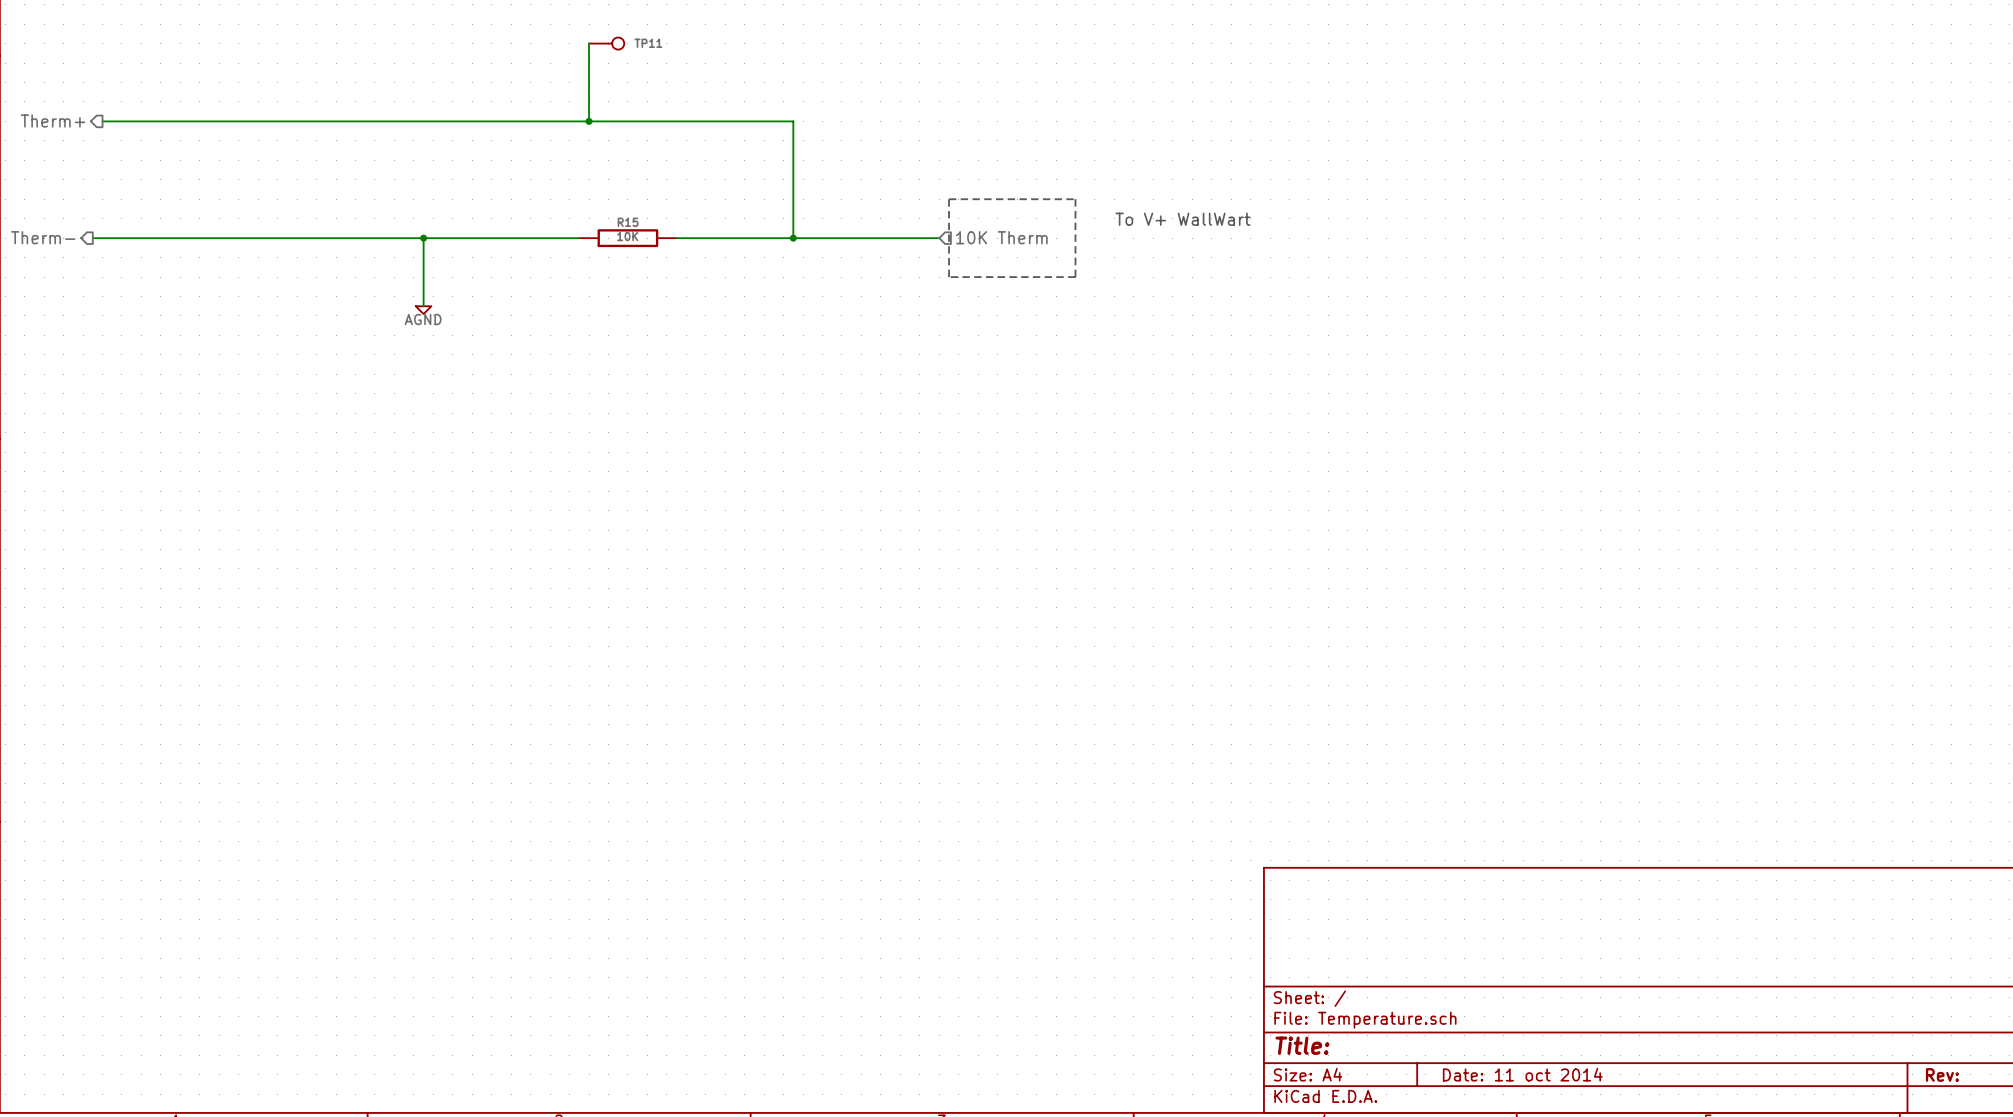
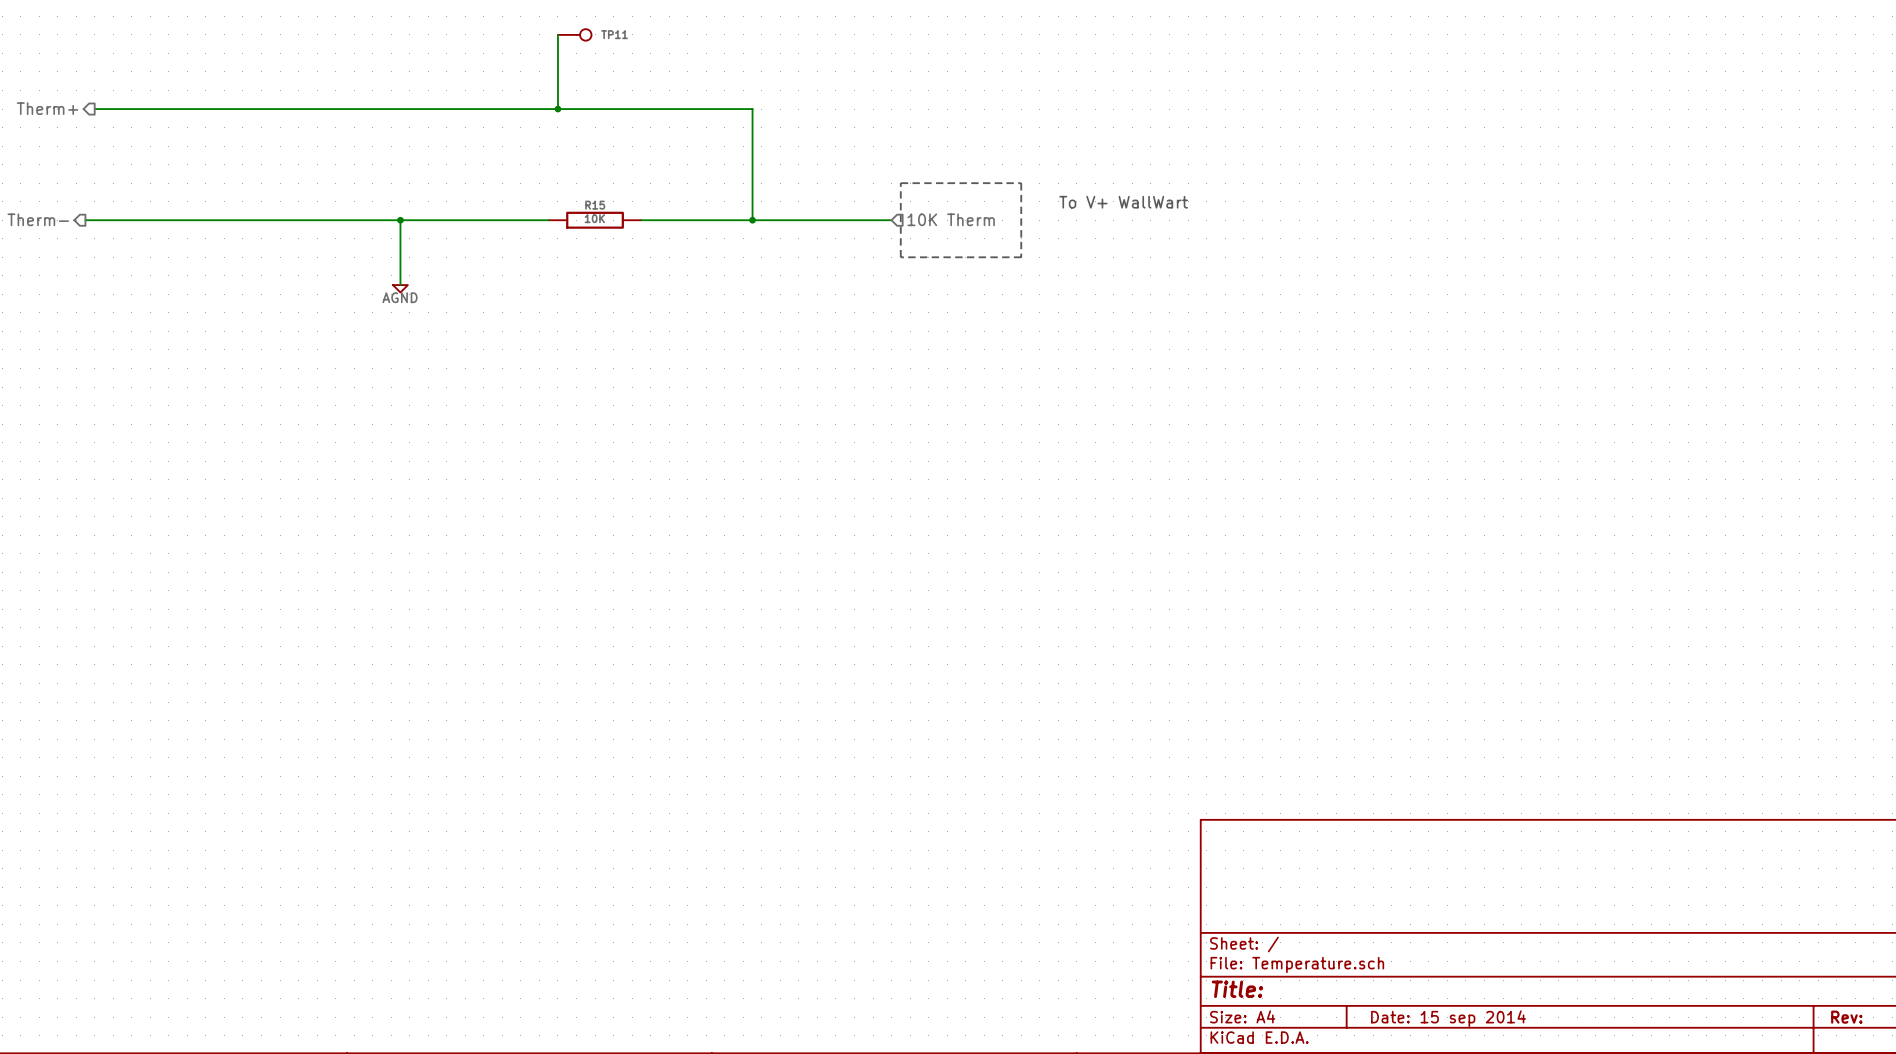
title block: Date: 11 oct 2014 (1522, 1074) -> Date: 15 sep 2014 (1448, 1018)

